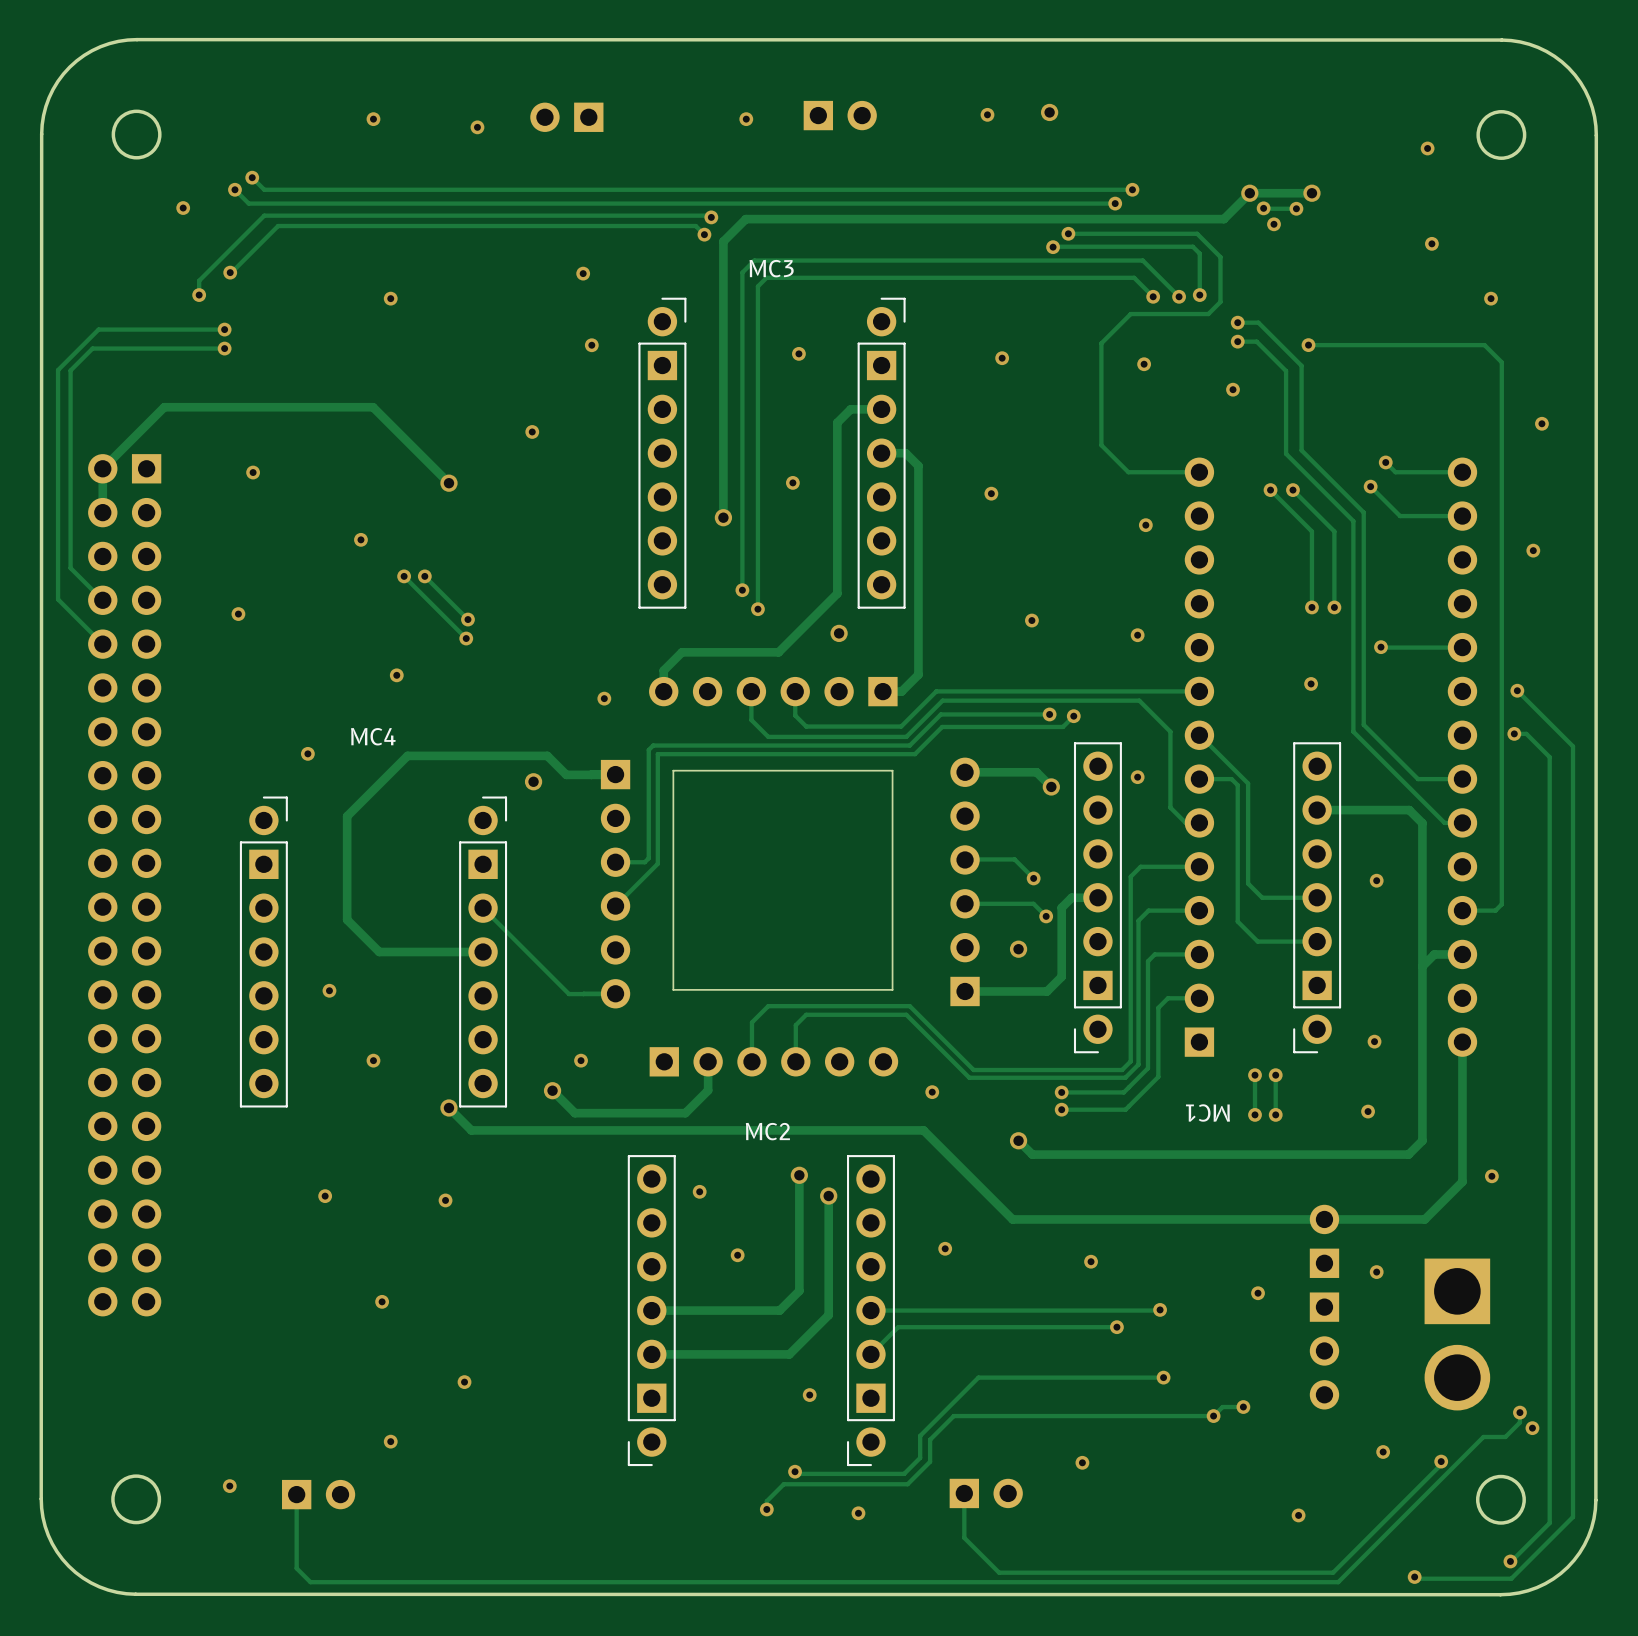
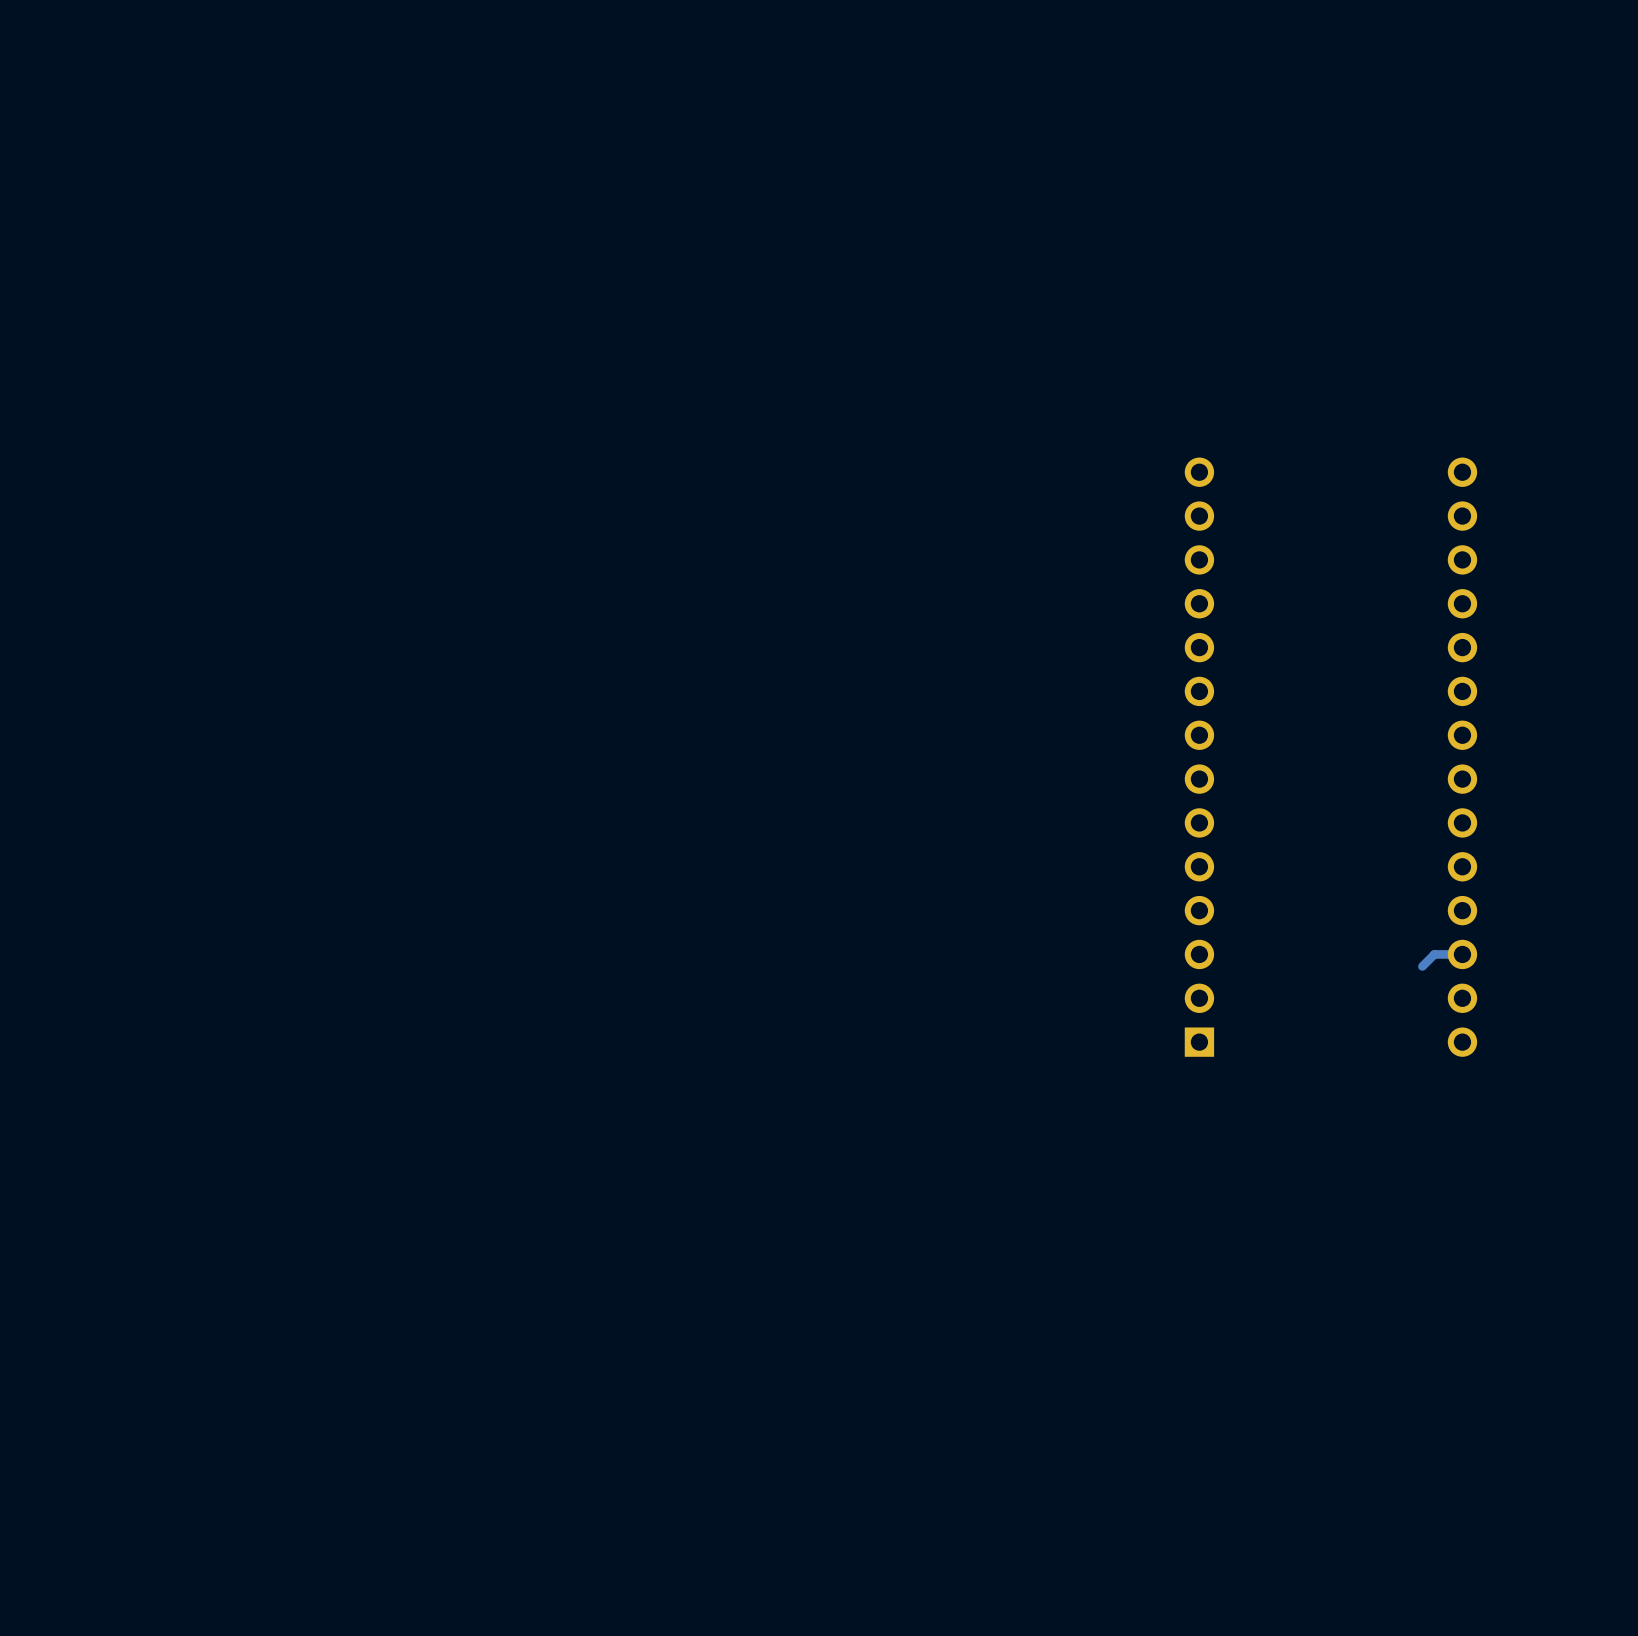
board edge: (137, 39) (1501, 40) (1520, 41) (1538, 47) (1554, 56) (1568, 68) (1580, 82) (1589, 99) (1594, 116) (1596, 135) (1595, 1500) (1593, 1518) (1588, 1536) (1579, 1552) (1567, 1567) (1553, 1578) (1536, 1587) (1519, 1592) (1500, 1594) (135, 1594) (117, 1592) (99, 1586) (83, 1578) (68, 1566) (56, 1551) (48, 1535) (42, 1517) (41, 1498) (41, 134) (43, 115) (49, 97) (57, 81) (69, 67) (84, 55) (100, 46) (118, 41) (137, 39) -> none
round board edge: [111, 109, 162, 160] -> none
round board edge: [1476, 110, 1527, 160] -> none
via: (1049, 112) -> none
via: (987, 114) -> none
part: (840, 115) -> none
part: (566, 117) -> none
via: (373, 119) -> none
via: (746, 119) -> none
via: (477, 127) -> none
via: (1427, 148) -> none
track: (252, 177) (264, 189) (1132, 189) -> none
via: (252, 177) -> none
track: (234, 189) (248, 203) (1115, 203) -> none
via: (234, 189) -> none
via: (1132, 189) -> none
via: (1249, 193) -> none
track: (1311, 193) (1249, 193) (1223, 219) (745, 219) (723, 241) (723, 517) -> none
via: (1311, 193) -> none
via: (1115, 203) -> none
via: (183, 208) -> none
track: (1263, 208) (1296, 208) -> none
via: (1263, 208) -> none
via: (1296, 208) -> none
track: (711, 217) (709, 215) (264, 215) (199, 280) (199, 295) -> none
via: (711, 217) -> none
via: (1273, 224) -> none
track: (1068, 233) (1197, 233) (1220, 257) (1220, 301) (1208, 314) (1130, 314) (1101, 343) (1101, 445) (1128, 472) (1199, 472) -> none
via: (1068, 233) -> none
track: (704, 234) (695, 226) (278, 226) (230, 272) -> none
via: (704, 234) -> none
via: (1431, 243) -> none
track: (1053, 247) (1192, 246) (1199, 253) (1199, 295) -> none
via: (1053, 247) -> none
via: (230, 272) -> none
via: (583, 273) -> none
via: (199, 295) -> none
via: (1199, 295) -> none
track: (1153, 296) (1134, 277) (766, 277) (757, 286) (757, 609) -> none
via: (1153, 296) -> none
track: (1179, 296) (1142, 260) (754, 260) (742, 272) (742, 590) -> none
via: (1179, 296) -> none
via: (390, 298) -> none
via: (1491, 298) -> none
track: (1237, 322) (1258, 322) (1301, 365) (1301, 450) (1363, 512) (1363, 724) (1418, 779) (1462, 779) -> none
via: (1237, 322) -> none
track: (224, 329) (98, 329) (58, 370) (58, 599) (102, 644) -> none
via: (224, 329) -> none
track: (1237, 341) (1256, 341) (1286, 371) (1286, 453) (1353, 521) (1353, 731) (1444, 822) (1462, 822) -> none
via: (1237, 341) -> none
via: (591, 345) -> none
track: (1308, 345) (1484, 345) (1501, 362) (1501, 904) (1495, 910) (1462, 910) -> none
via: (1308, 345) -> none
track: (224, 348) (92, 348) (70, 370) (70, 568) (102, 600) -> none
via: (224, 348) -> none
via: (798, 353) -> none
via: (1002, 358) -> none
via: (1144, 364) -> none
via: (1233, 389) -> none
track: (881, 409) (850, 409) (837, 422) (837, 593) (778, 652) (681, 652) (663, 670) (663, 691) -> none
via: (1541, 423) -> none
via: (532, 431) -> none
MC3: (772, 453) -> none
track: (881, 453) (905, 453) (918, 465) (918, 674) (901, 691) (882, 691) -> none
track: (1385, 462) (1395, 472) (1462, 472) -> none
via: (1385, 462) -> none
via: (253, 472) -> none
via: (792, 482) -> none
track: (448, 483) (373, 407) (164, 407) (102, 468) (102, 512) -> none
via: (448, 483) -> none
track: (1370, 486) (1400, 516) (1462, 516) -> none
via: (1370, 486) -> none
track: (1270, 490) (1311, 531) (1311, 607) -> none
via: (1270, 490) -> none
track: (1292, 490) (1334, 531) (1334, 607) -> none
via: (1292, 490) -> none
via: (991, 493) -> none
via: (723, 517) -> none
via: (1145, 525) -> none
via: (360, 539) -> none
via: (1533, 550) -> none
track: (404, 576) (466, 638) -> none
via: (404, 576) -> none
track: (424, 576) (467, 619) -> none
via: (424, 576) -> none
via: (742, 590) -> none
via: (1311, 607) -> none
via: (1334, 607) -> none
via: (757, 609) -> none
via: (238, 614) -> none
via: (467, 619) -> none
via: (1031, 620) -> none
via: (839, 633) -> none
via: (1137, 635) -> none
via: (466, 638) -> none
track: (1381, 647) (1462, 647) -> none
via: (1381, 647) -> none
via: (396, 675) -> none
via: (1311, 683) -> none
track: (1517, 690) (1573, 746) (1573, 1517) (1511, 1578) (1416, 1578) (1414, 1577) -> none
via: (1517, 690) -> none
track: (751, 691) (751, 720) (768, 736) (906, 736) (942, 700) (1139, 700) (1170, 731) (1170, 807) (1185, 822) (1199, 822) -> none
part: (773, 691) -> none
track: (1199, 691) (936, 691) (901, 726) (806, 726) (795, 715) (795, 691) -> none
via: (604, 698) -> none
track: (1049, 714) (940, 714) (909, 745) (653, 745) (648, 749) (648, 858) (644, 862) (615, 862) -> none
via: (1049, 714) -> none
track: (1073, 716) (1063, 726) (942, 726) (914, 754) (657, 754) (657, 863) (615, 906) -> none
via: (1073, 716) -> none
track: (1514, 733) (1526, 733) (1549, 757) (1549, 1523) (1510, 1561) -> none
via: (1514, 733) -> none
track: (1199, 735) (1248, 783) (1248, 883) (1262, 897) (1317, 897) -> none
via: (307, 753) -> none
board edge: (892, 770) (673, 770) (673, 989) (892, 989) (892, 770) -> none
track: (965, 772) (1036, 772) (1051, 786) -> none
track: (600, 774) (566, 774) (547, 755) (407, 755) (347, 816) (347, 919) (379, 952) (483, 952) -> none
via: (1137, 777) -> none
track: (1199, 779) (1231, 779) (1237, 785) (1237, 921) (1257, 941) (1317, 941) -> none
via: (533, 781) -> none
via: (1051, 786) -> none
track: (1317, 810) (1409, 810) (1422, 823) (1422, 1140) (1408, 1154) (1032, 1154) (1018, 1140) -> none
track: (965, 859) (1014, 859) (1033, 878) -> none
track: (1199, 866) (1140, 866) (1130, 876) (1130, 1061) (1122, 1070) (973, 1070) (909, 1006) (768, 1006) (751, 1022) (751, 1061) -> none
via: (1033, 878) -> none
via: (1376, 880) -> none
part: (965, 881) -> none
part: (615, 884) -> none
part: (124, 885) -> none
track: (1097, 897) (1071, 897) (1061, 907) (1061, 976) (1047, 991) (965, 991) -> none
MC1: (1207, 897) -> none
track: (965, 903) (1033, 903) (1046, 916) -> none
track: (483, 908) (568, 994) (600, 994) -> none
track: (1199, 910) (1148, 910) (1138, 920) (1138, 1064) (1125, 1077) (969, 1077) (906, 1014) (806, 1014) (795, 1025) (795, 1061) -> none
via: (1046, 916) -> none
via: (1018, 949) -> none
MC4: (373, 952) -> none
track: (1199, 954) (1154, 954) (1148, 961) (1148, 1068) (1123, 1092) (1061, 1092) -> none
via: (329, 990) -> none
track: (1199, 998) (1167, 998) (1158, 1007) (1158, 1076) (1125, 1109) (1061, 1109) -> none
via: (1374, 1041) -> none
track: (1462, 1042) (1462, 1181) (1424, 1219) (1012, 1219) (923, 1130) (471, 1130) (448, 1107) -> none
via: (373, 1060) -> none
via: (581, 1060) -> none
track: (708, 1061) (708, 1090) (685, 1113) (574, 1113) (552, 1090) -> none
part: (773, 1061) -> none
track: (1255, 1075) (1255, 1114) -> none
via: (1255, 1075) -> none
track: (1275, 1075) (1275, 1114) -> none
via: (1275, 1075) -> none
via: (552, 1090) -> none
via: (932, 1092) -> none
via: (1061, 1092) -> none
via: (448, 1107) -> none
via: (1061, 1109) -> none
via: (1368, 1111) -> none
via: (1255, 1114) -> none
via: (1275, 1114) -> none
via: (1018, 1140) -> none
track: (799, 1175) (799, 1290) (779, 1310) (651, 1310) -> none
via: (799, 1175) -> none
via: (1491, 1176) -> none
via: (699, 1191) -> none
via: (325, 1196) -> none
track: (828, 1196) (828, 1315) (789, 1354) (651, 1354) -> none
via: (828, 1196) -> none
via: (445, 1200) -> none
via: (945, 1248) -> none
via: (737, 1255) -> none
via: (1091, 1261) -> none
via: (1376, 1272) -> none
via: (1258, 1293) -> none
via: (382, 1301) -> none
part: (1324, 1307) -> none
track: (1160, 1309) (870, 1310) -> none
via: (1160, 1309) -> none
MC2: (761, 1310) -> none
track: (1116, 1327) (898, 1327) (870, 1354) -> none
via: (1116, 1327) -> none
part: (1457, 1334) -> none
track: (1163, 1377) (978, 1377) (920, 1435) (920, 1457) (904, 1473) (797, 1473) (795, 1471) -> none
via: (1163, 1377) -> none
via: (464, 1382) -> none
via: (809, 1395) -> none
track: (1243, 1407) (1222, 1407) (1213, 1416) (953, 1416) (930, 1439) (930, 1461) (907, 1484) (783, 1484) (766, 1501) (766, 1509) -> none
via: (1243, 1407) -> none
via: (1519, 1412) -> none
track: (1518, 1414) (1519, 1412) (1519, 1422) (1505, 1436) (1483, 1436) (1338, 1582) (310, 1582) (296, 1568) (296, 1494) -> none
via: (1213, 1416) -> none
via: (1532, 1428) -> none
via: (390, 1441) -> none
via: (1383, 1452) -> none
track: (1441, 1461) (1441, 1464) (1333, 1572) (999, 1572) (964, 1537) (964, 1493) -> none
via: (1441, 1461) -> none
via: (1082, 1462) -> none
via: (795, 1471) -> none
round board edge: [111, 1474, 162, 1525] -> none
round board edge: [1475, 1474, 1526, 1525] -> none
via: (229, 1486) -> none
part: (986, 1493) -> none
part: (318, 1494) -> none
via: (766, 1509) -> none
via: (858, 1513) -> none
via: (1298, 1515) -> none
via: (1510, 1561) -> none
via: (1414, 1577) -> none

